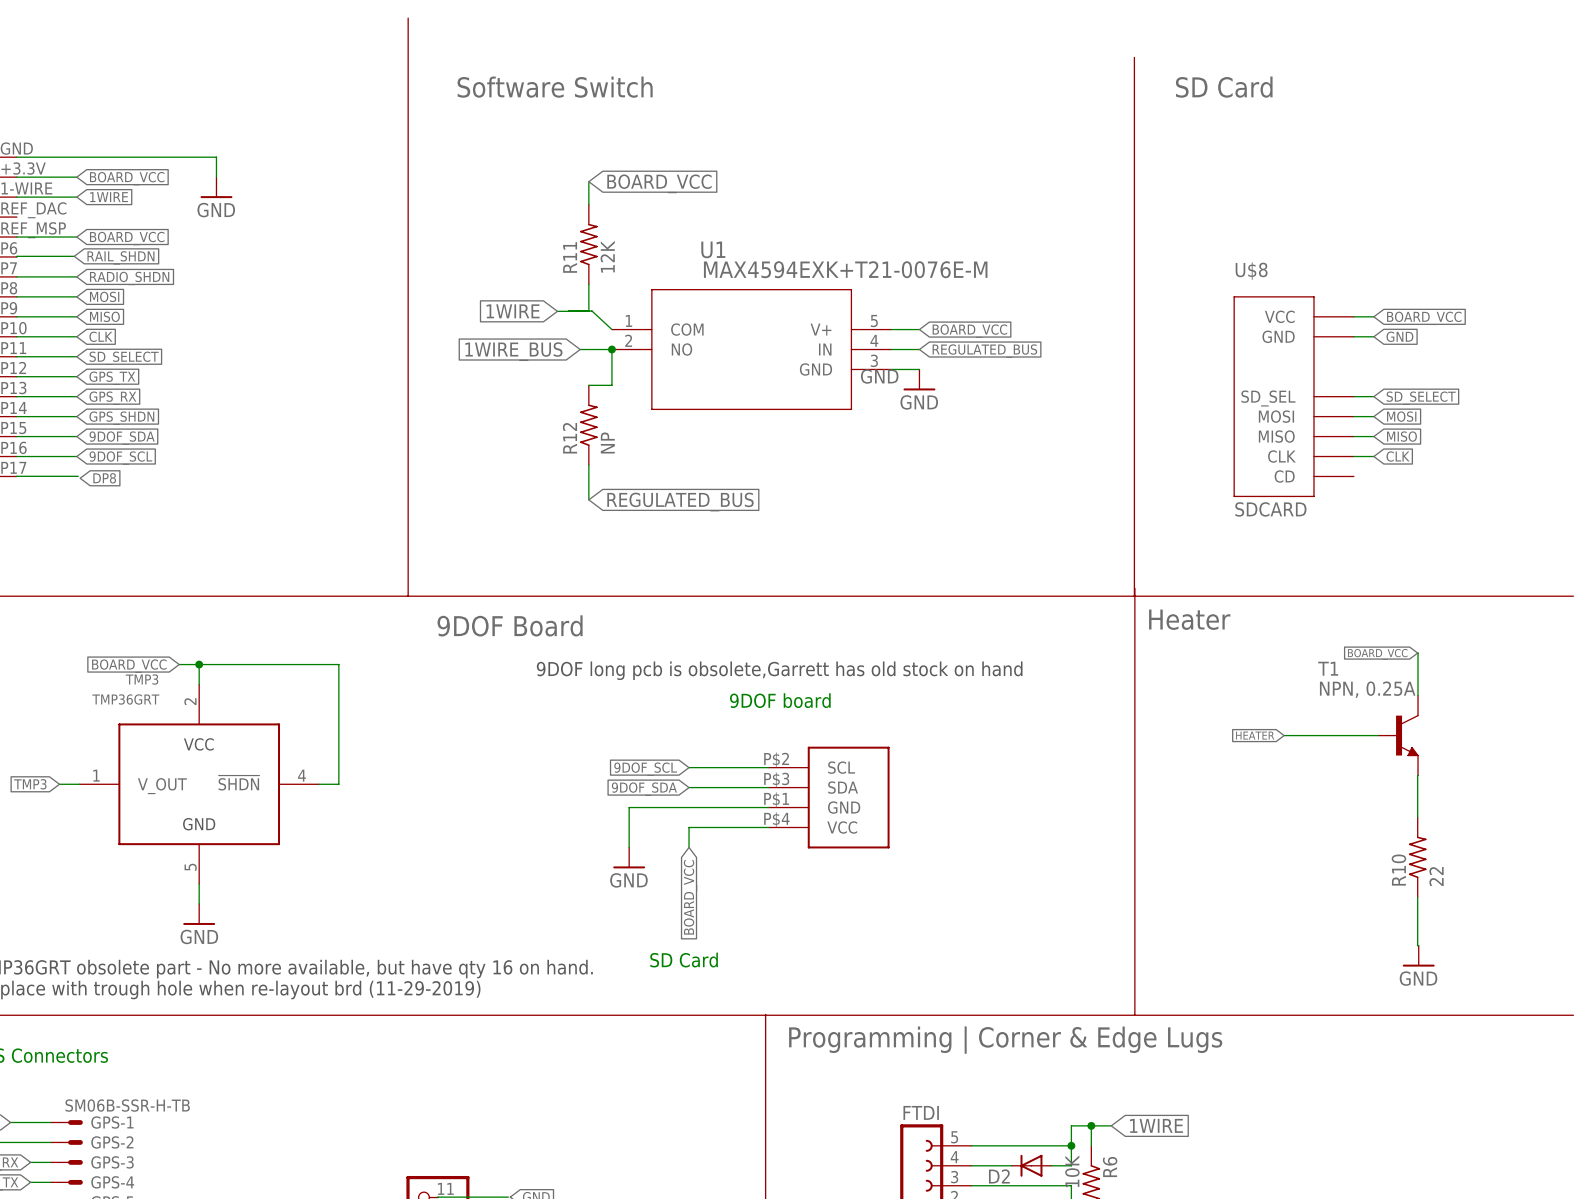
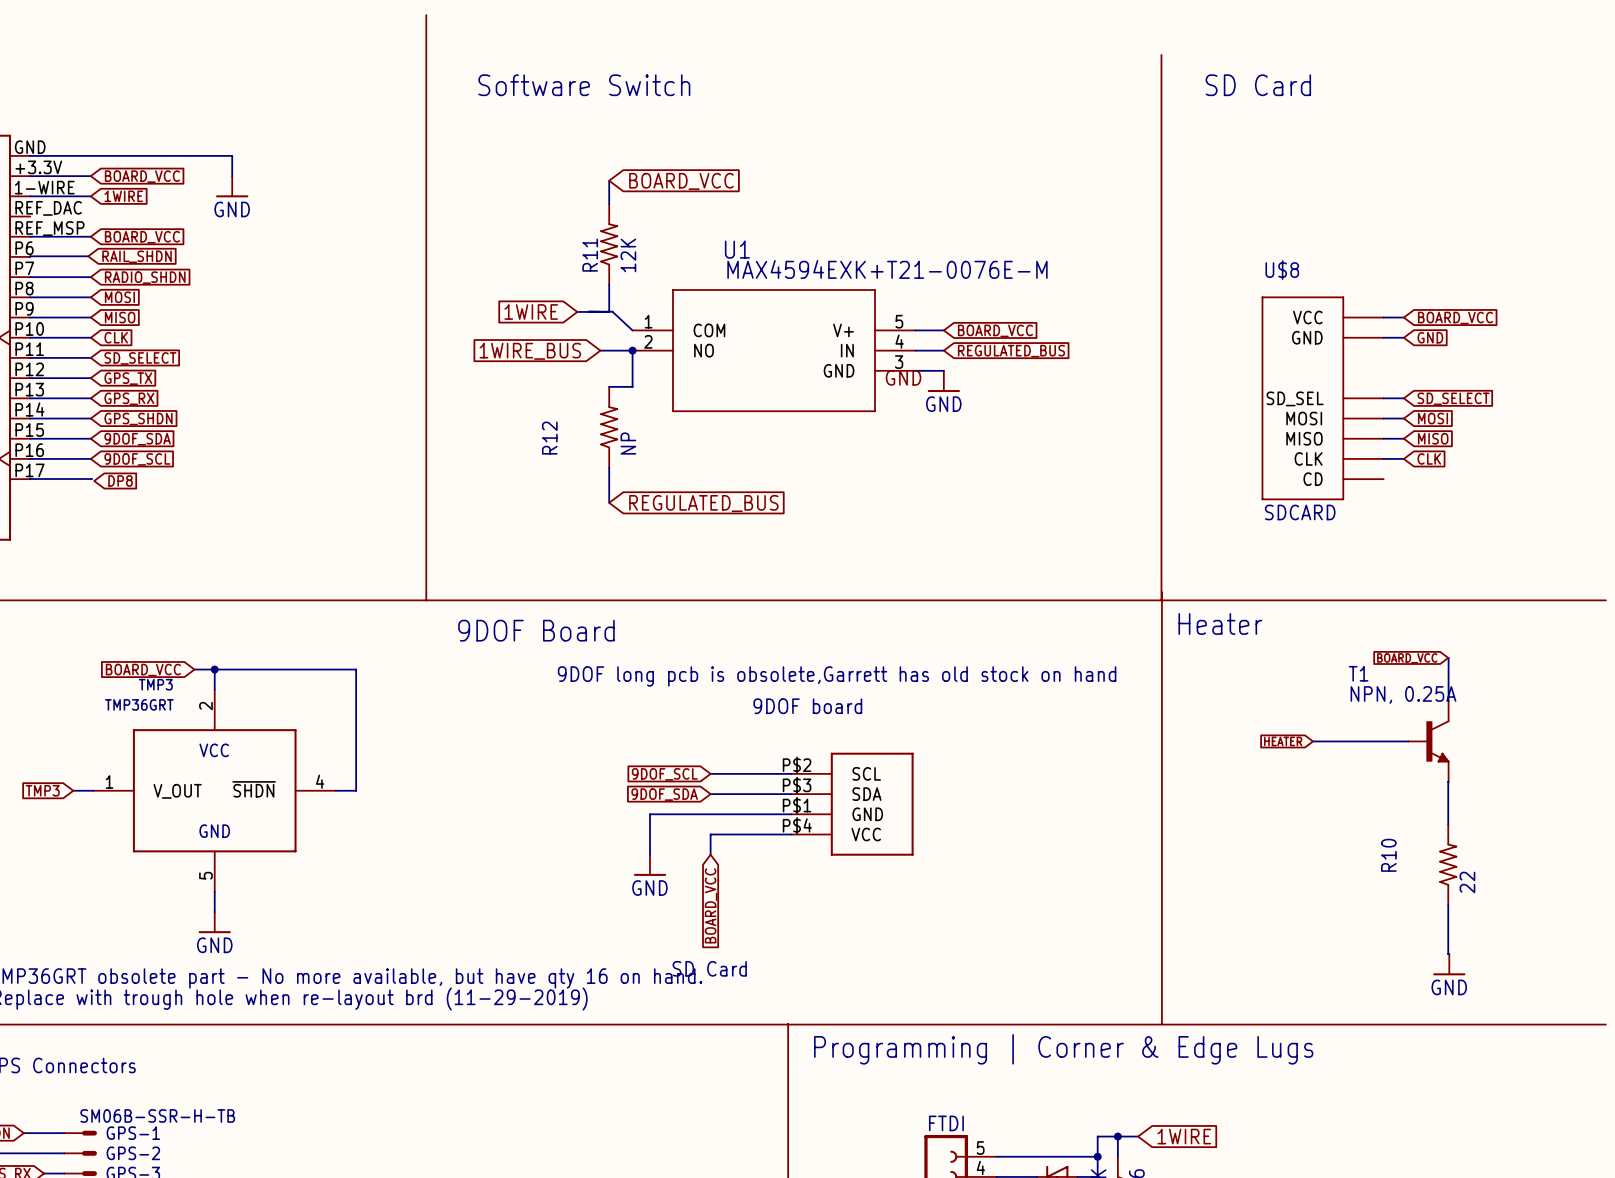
R12 name position: R12 (569, 438) -> R12 (549, 438)
R10 name position: R10 (1398, 870) -> R10 (1388, 855)

